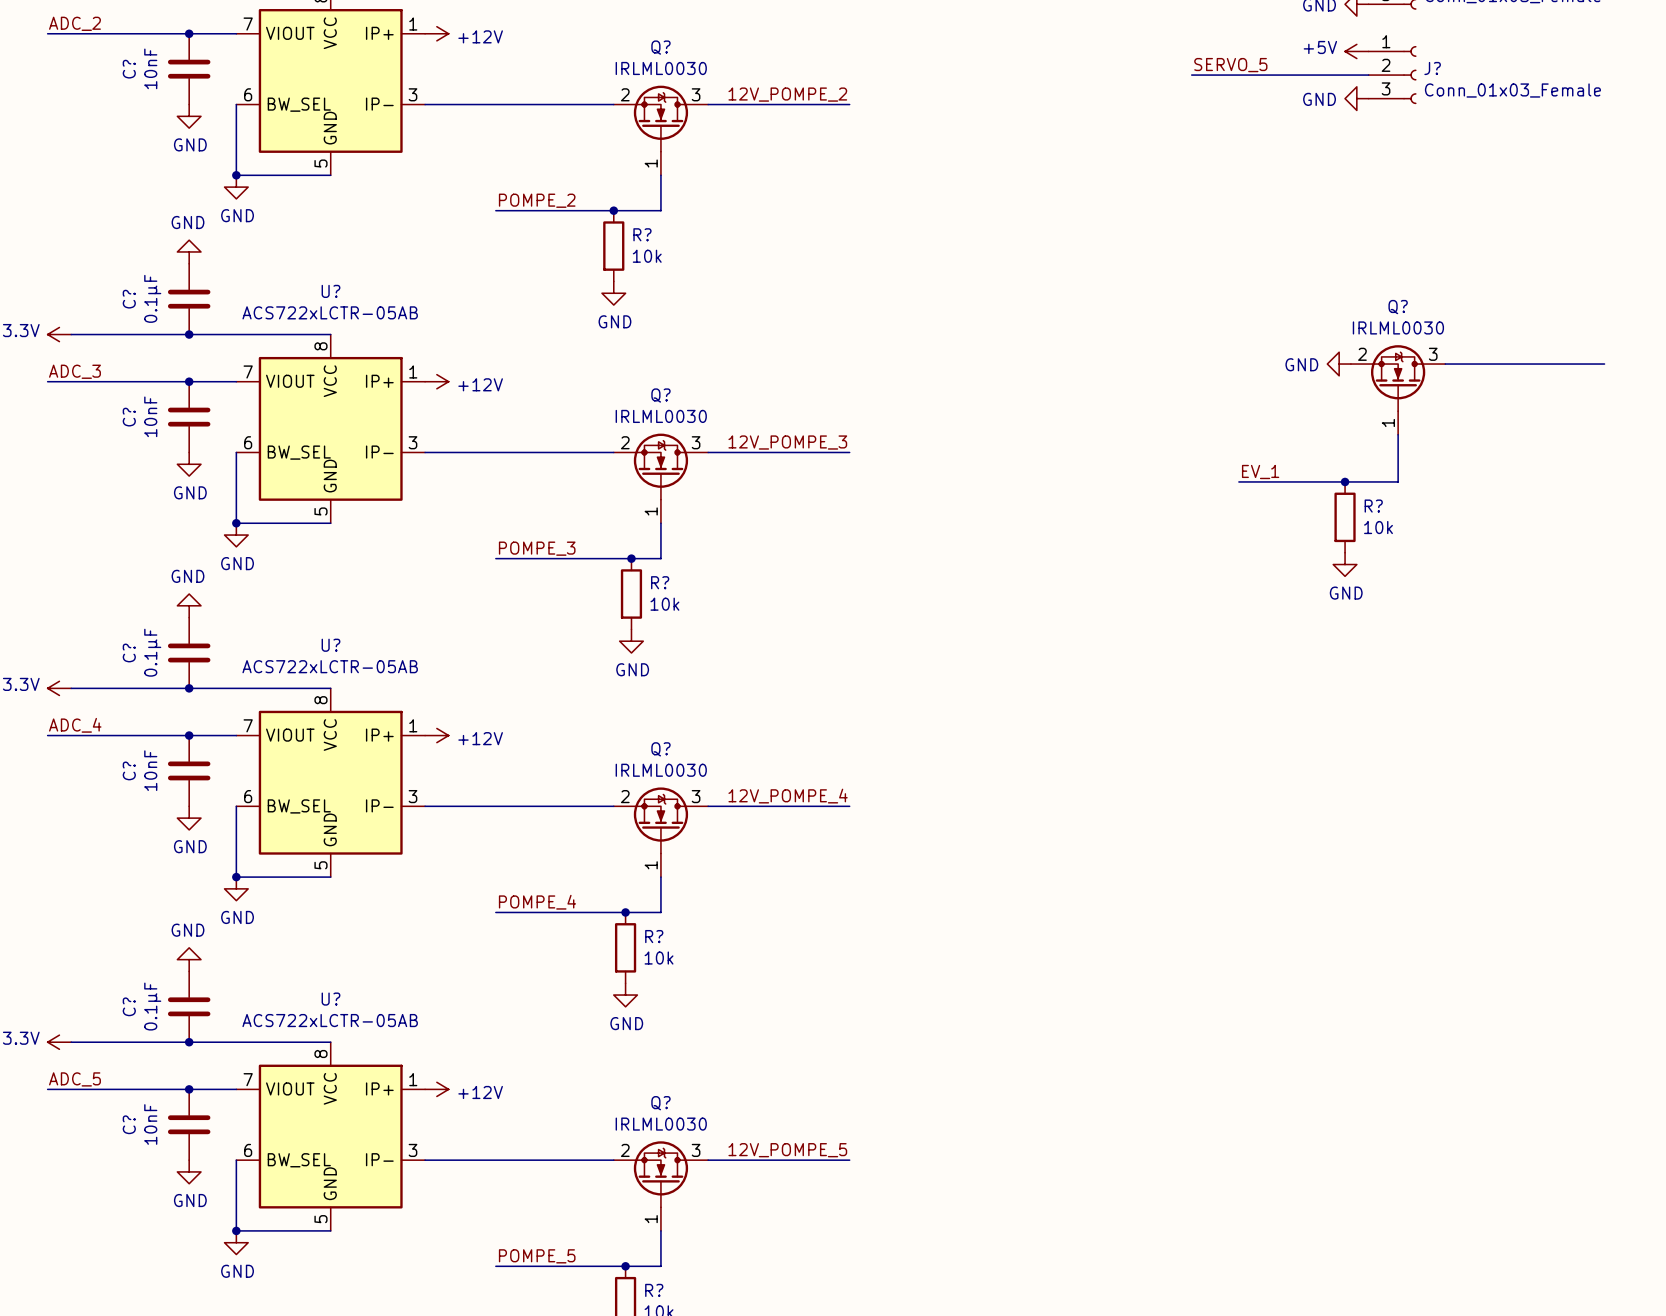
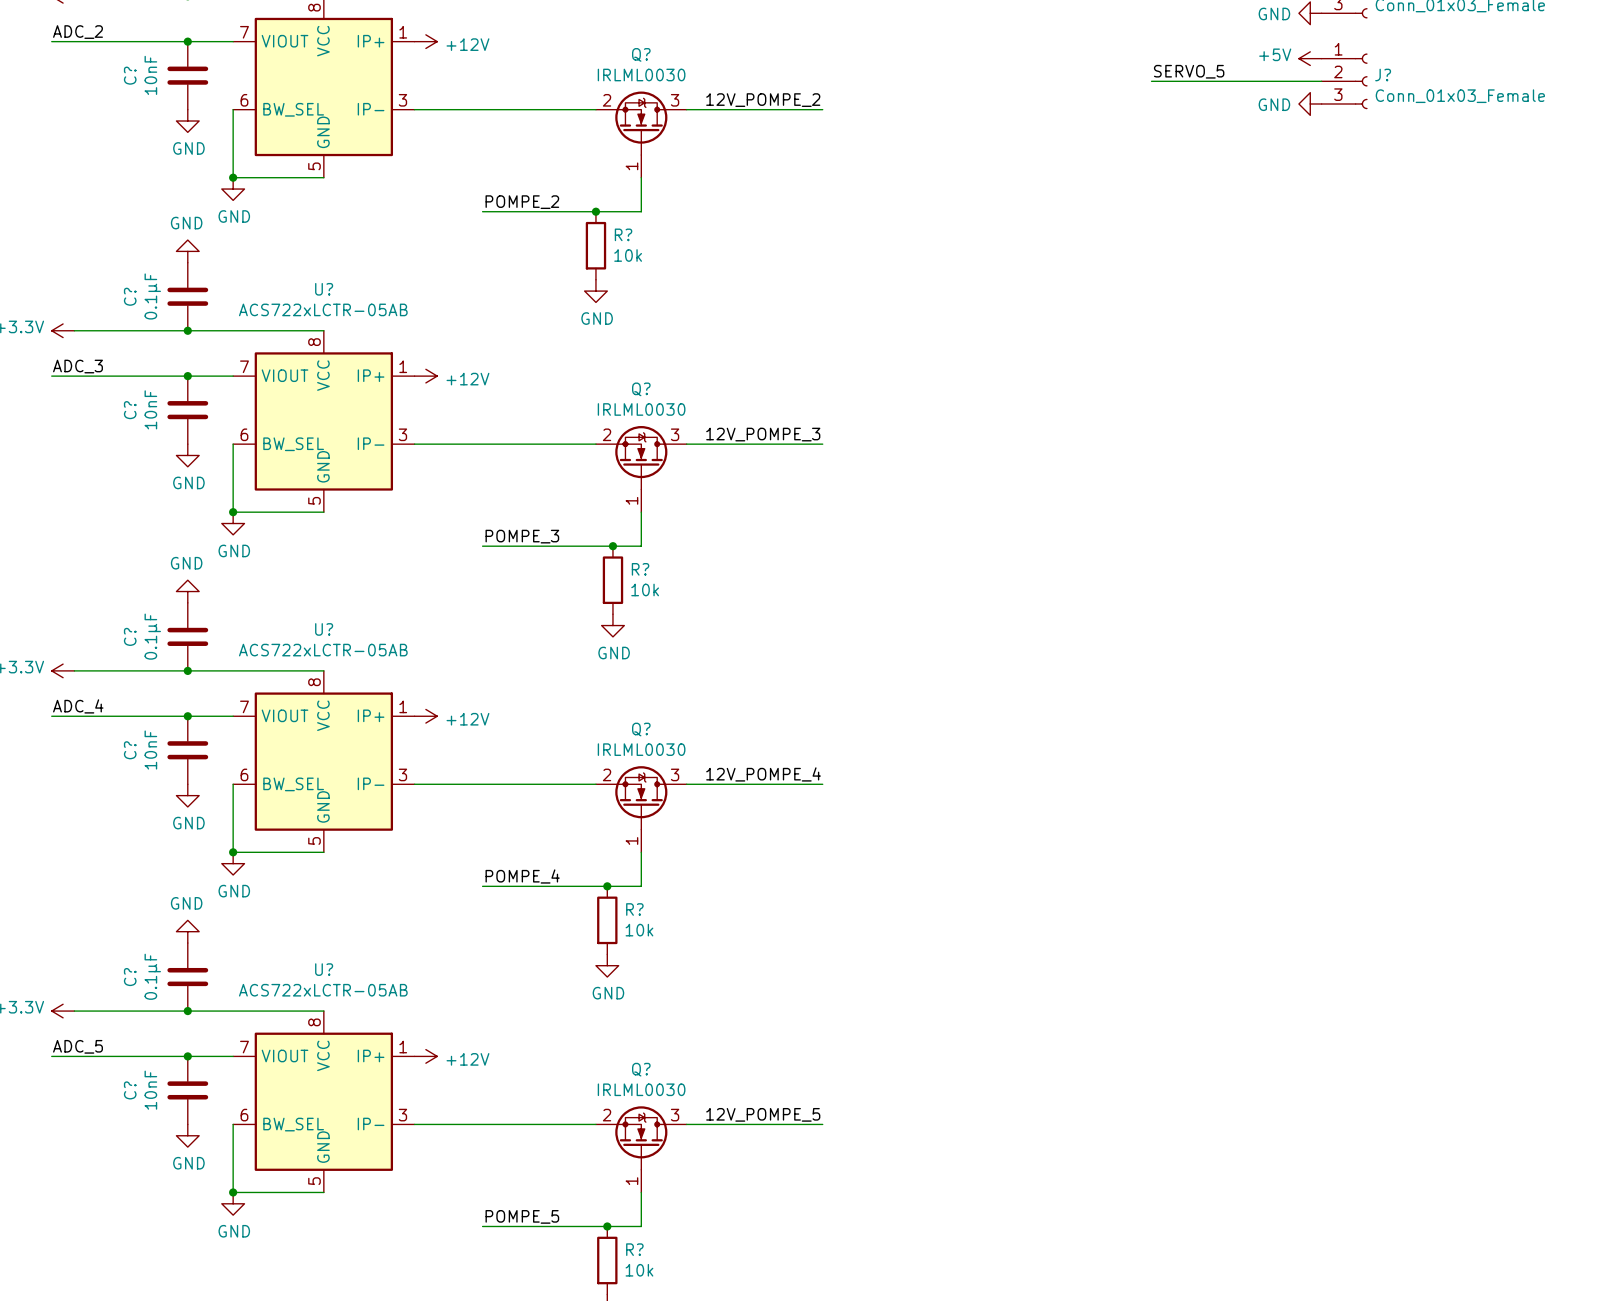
power symbol: GND (1339, 364) -> none
wire: (1445, 364) (1604, 364) -> none
Q?: IRLML0030 (1398, 389) -> none
wire: (1398, 434) (1398, 481) (1238, 481) -> none
label: EV_1 (1260, 472) -> none
junction: (1345, 481) -> none
R?: 10k (1345, 517) -> none
power symbol: GND (1345, 564) -> none

